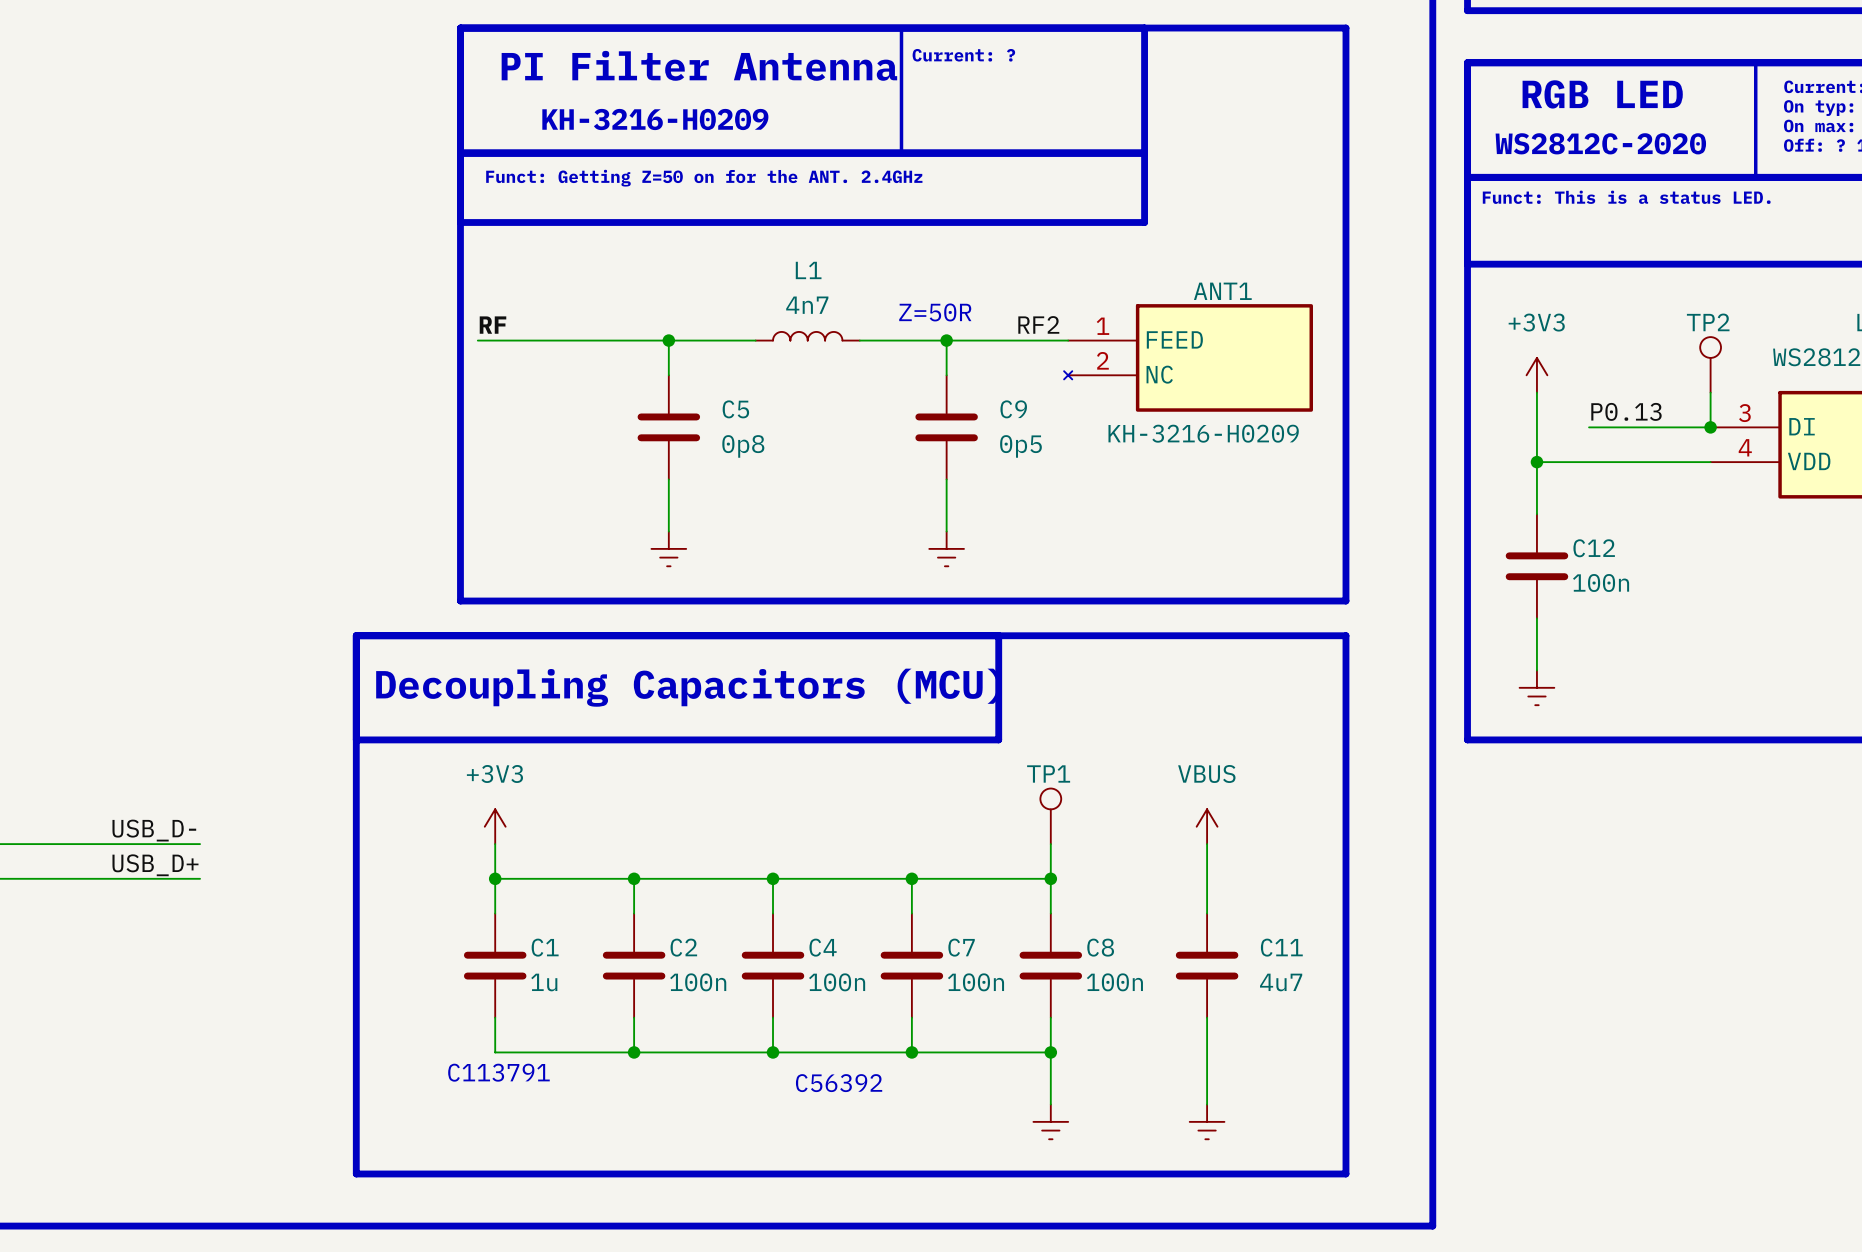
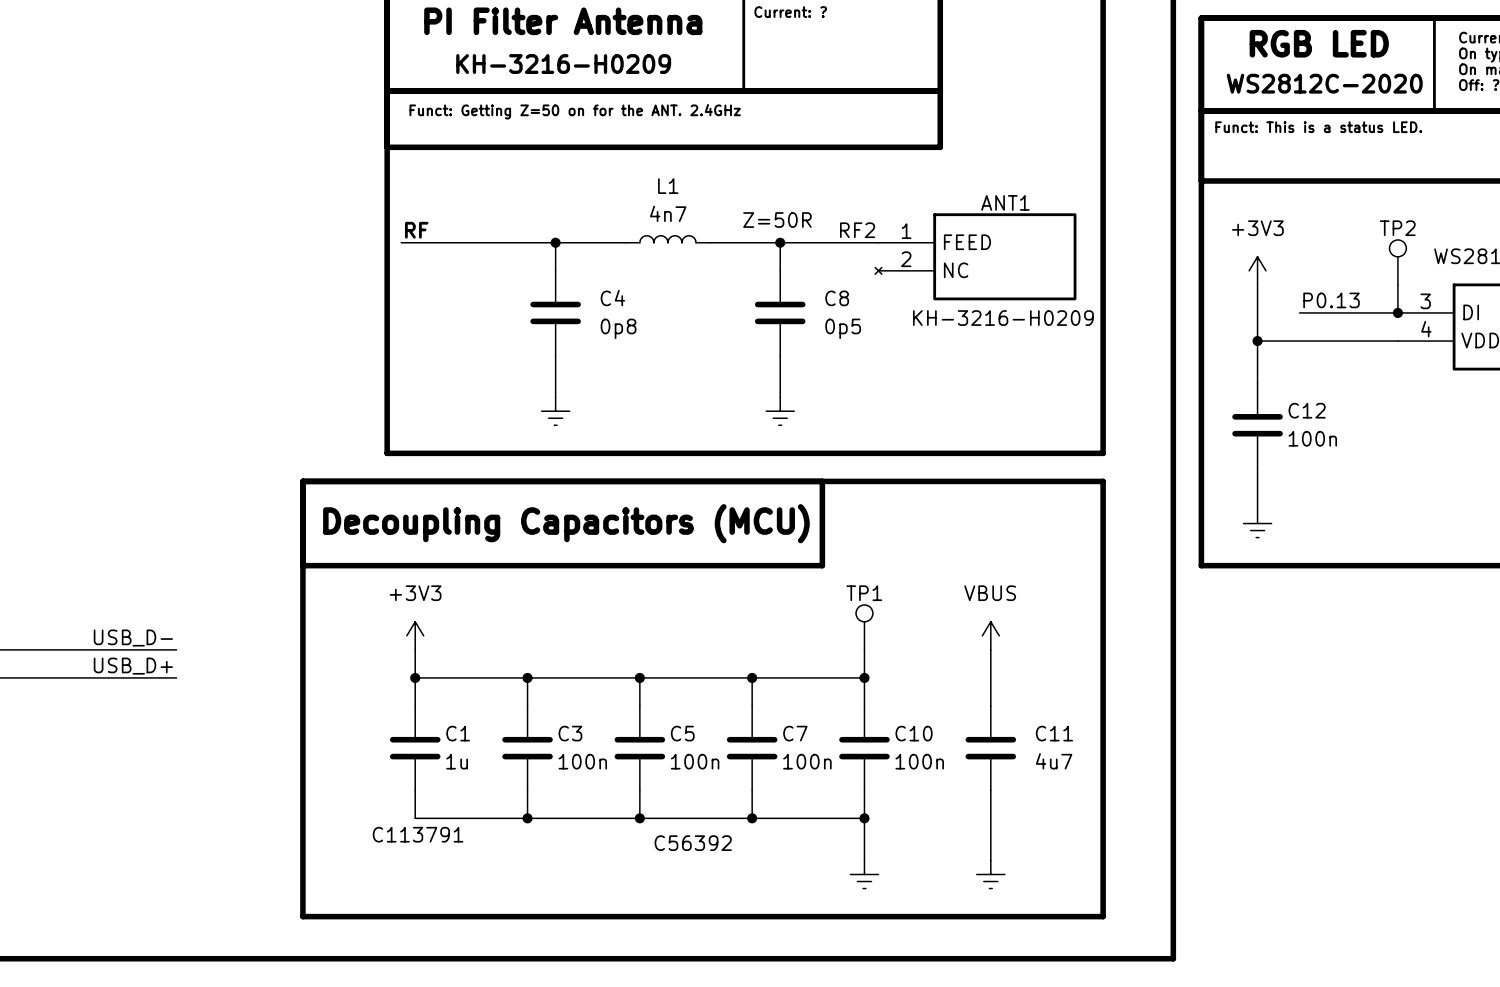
C5 name: C5 (735, 409) -> C4 (612, 298)
C9 name: C9 (1013, 409) -> C8 (837, 298)
C2 name: C2 (683, 947) -> C3 (570, 733)
C4 name: C4 (823, 947) -> C5 (682, 733)
C8 name: C8 (1100, 947) -> C10 (914, 733)

